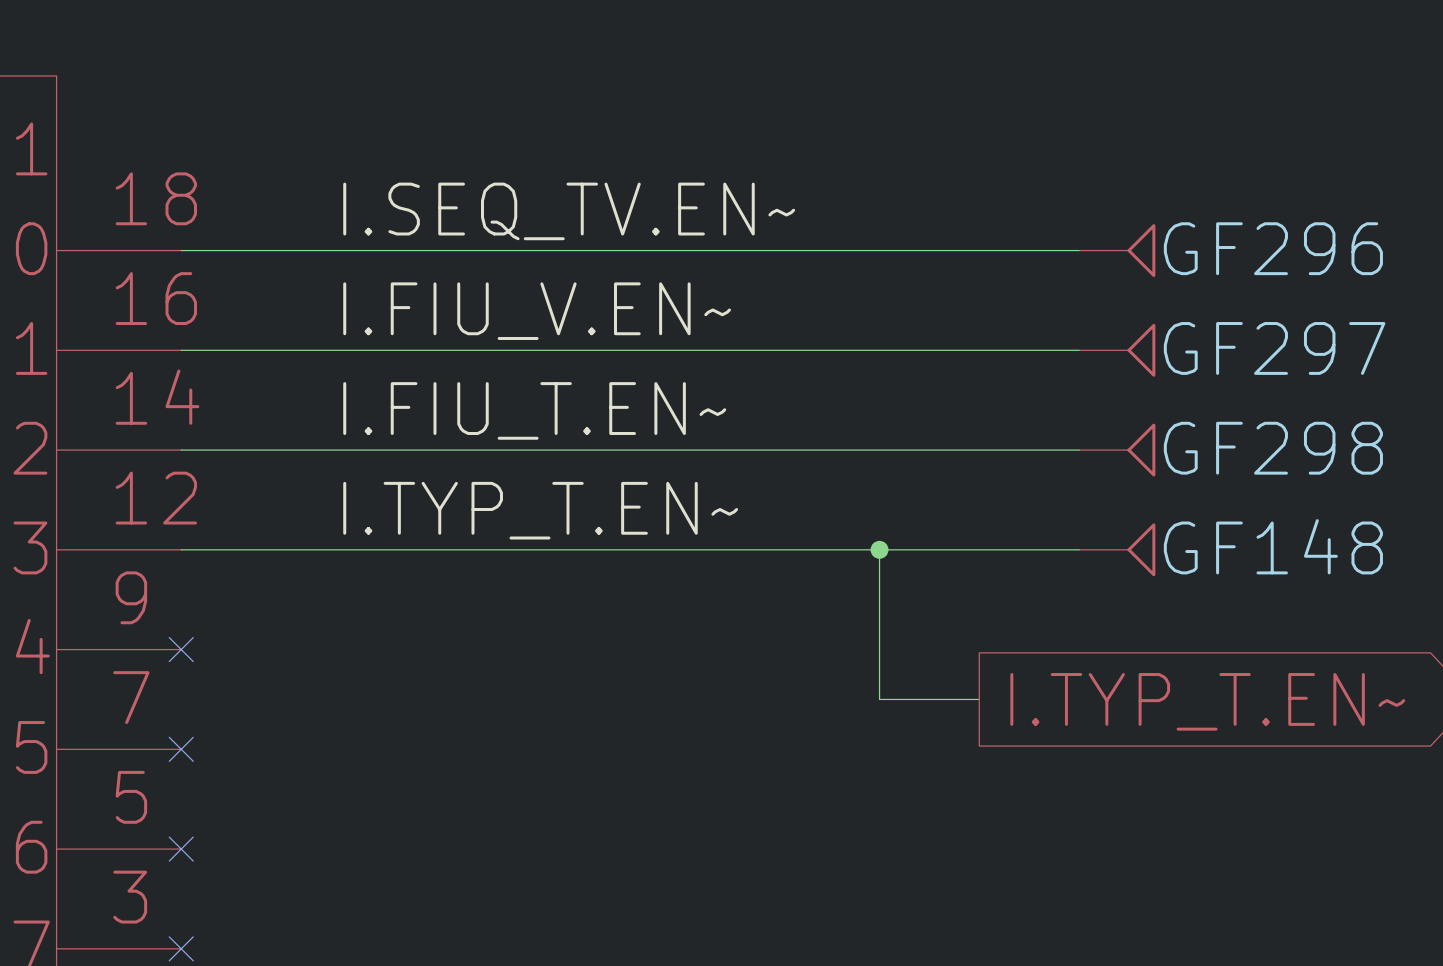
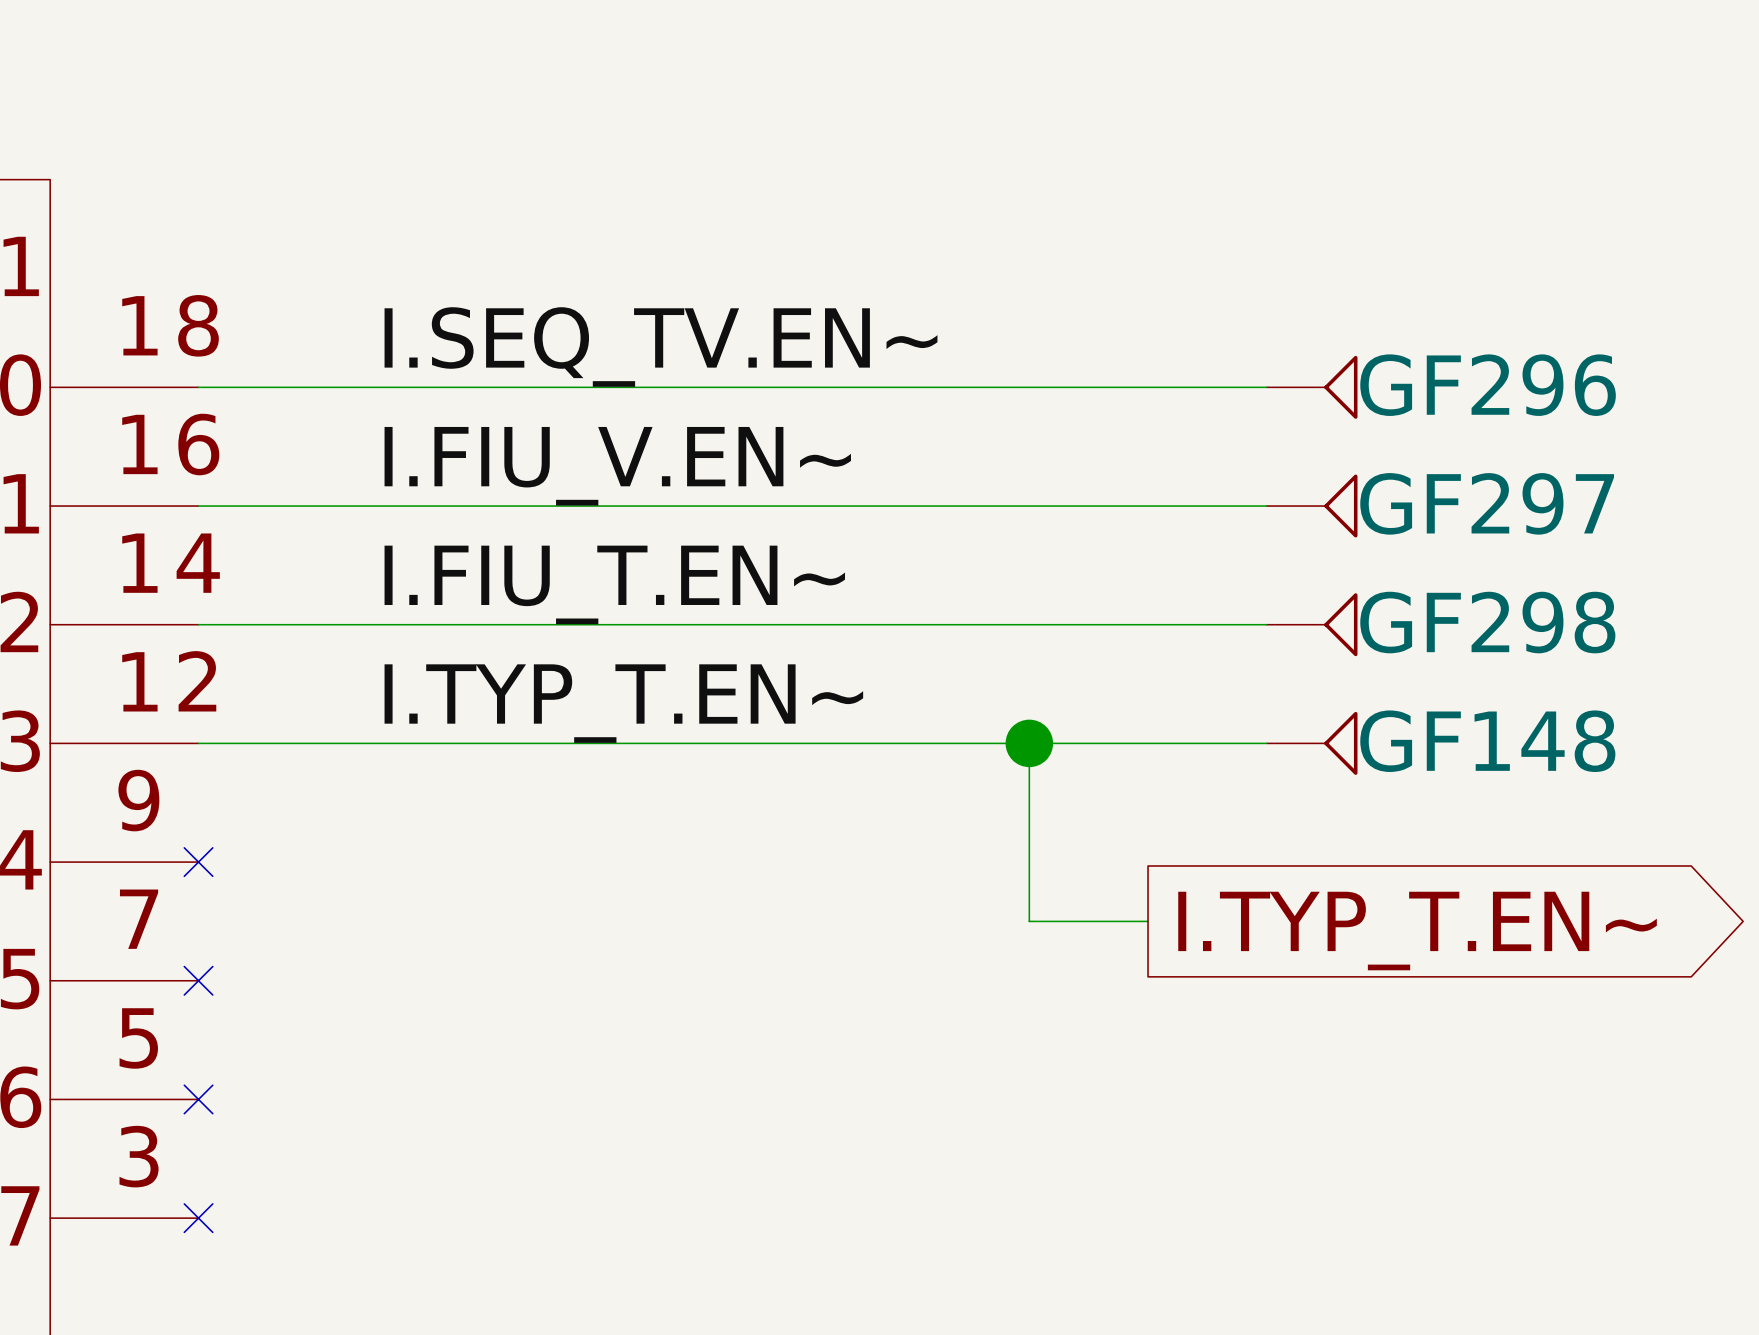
junction size: [870, 540, 889, 559] -> [1005, 719, 1054, 768]

